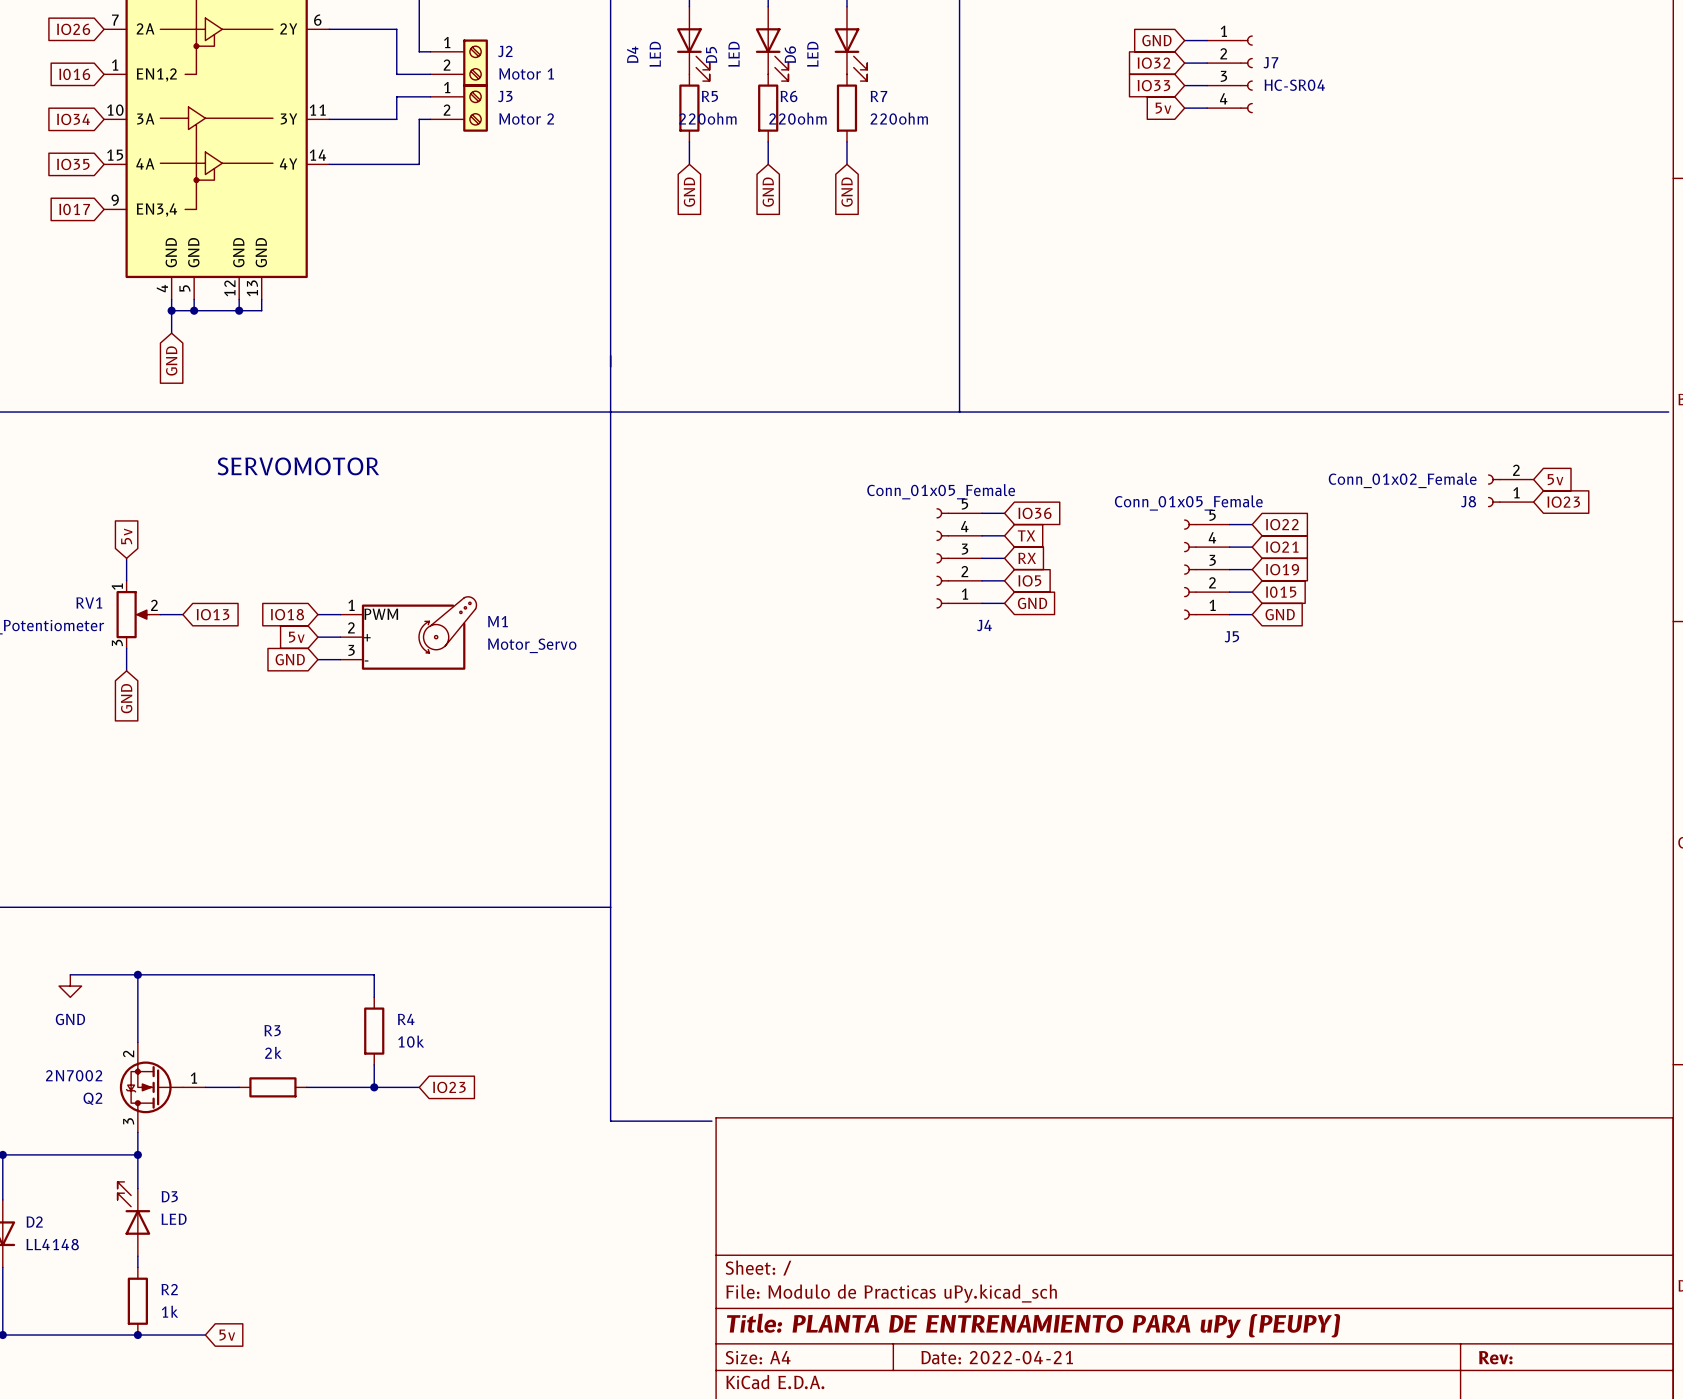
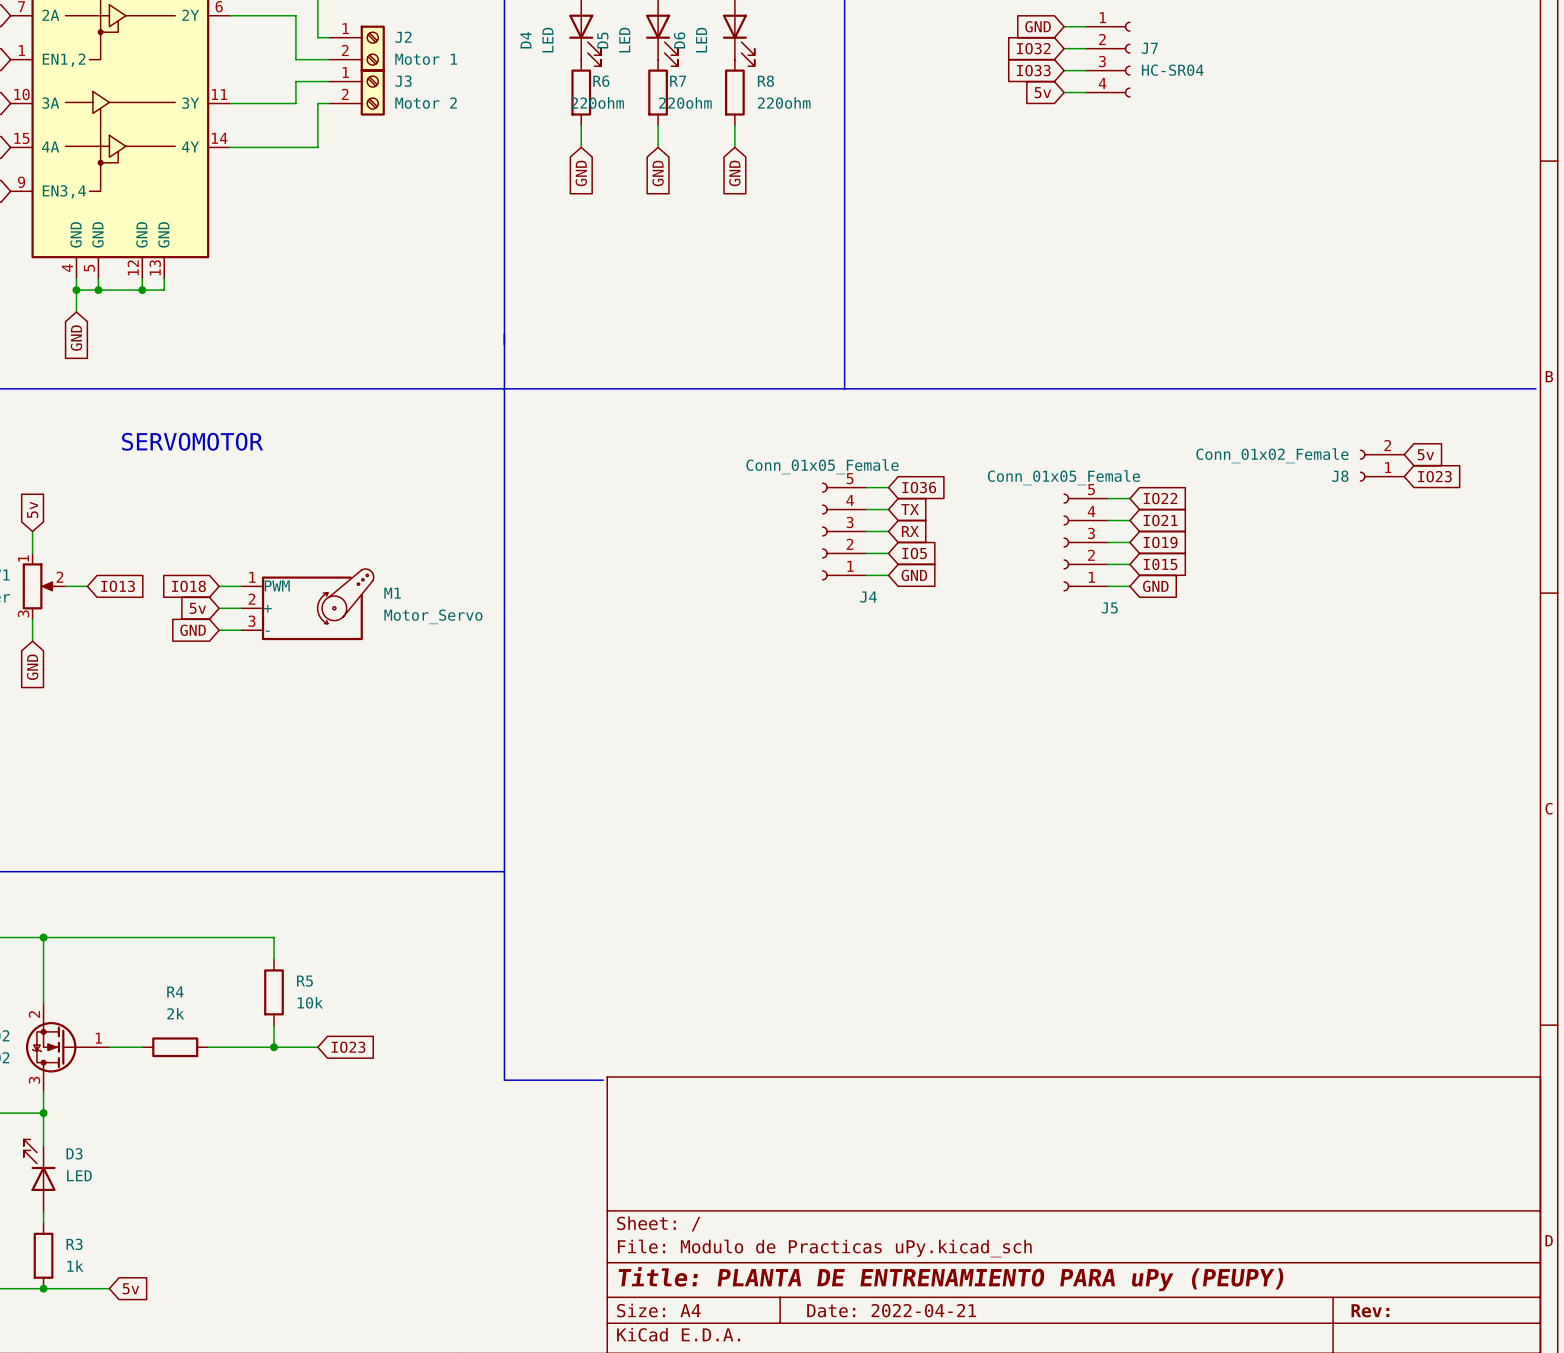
R5 name: R5 (709, 96) -> R6 (601, 81)
R6 name: R6 (789, 96) -> R7 (678, 81)
R7 name: R7 (878, 96) -> R8 (765, 81)
R4 name: R4 (406, 1019) -> R5 (304, 981)
R3 name: R3 (272, 1030) -> R4 (175, 991)
R2 name: R2 (169, 1289) -> R3 (74, 1244)

